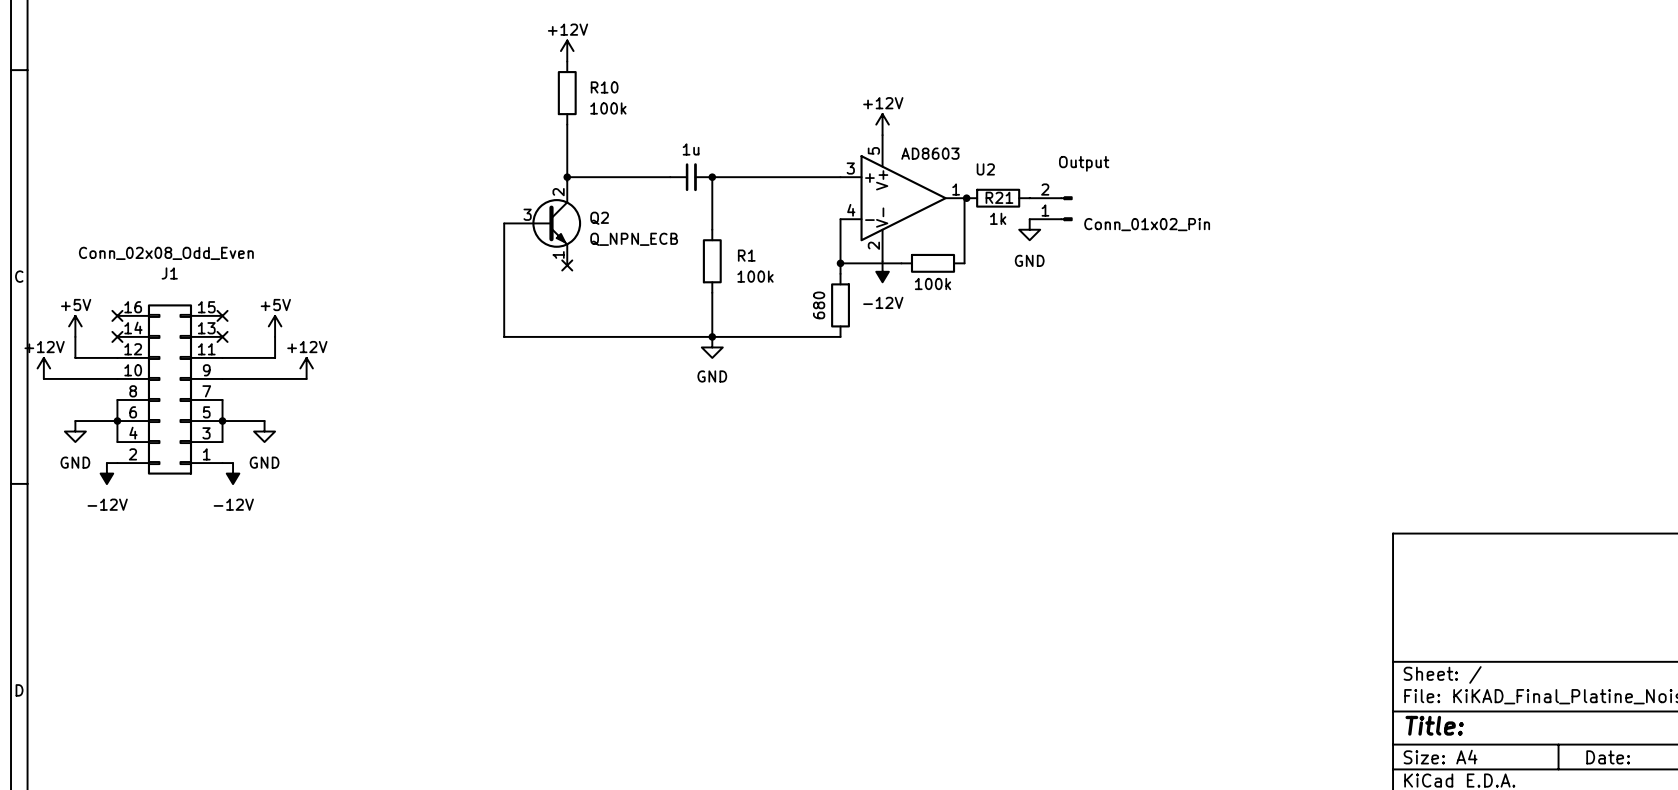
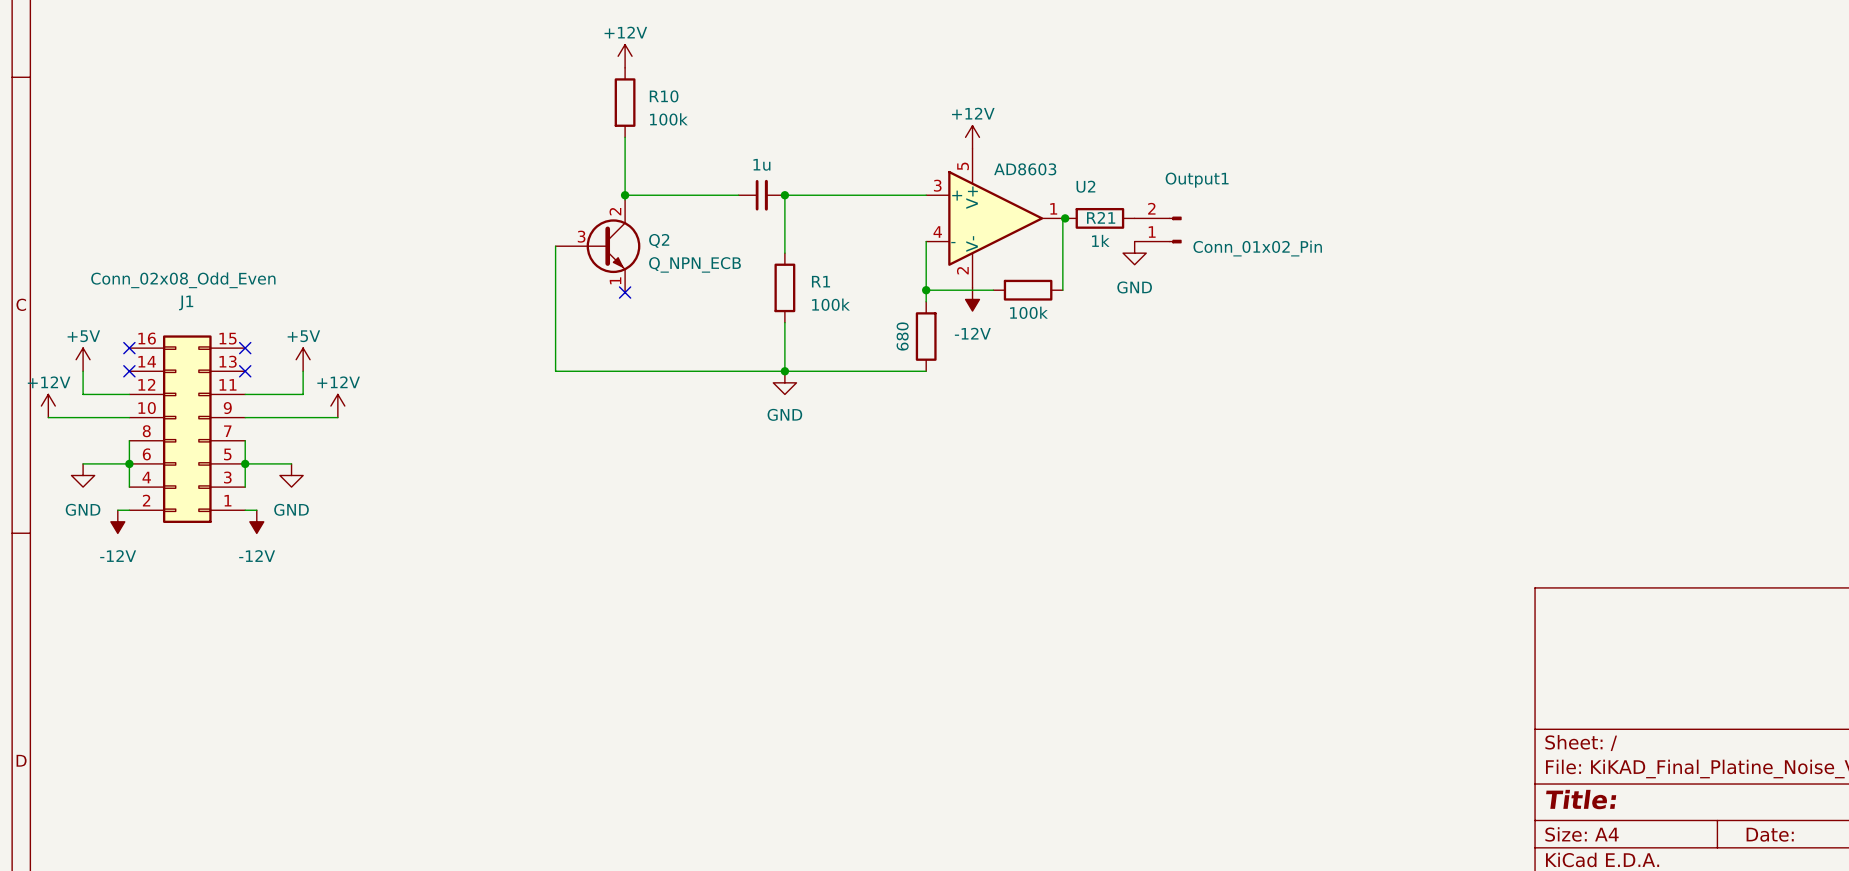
Output name: Output (1084, 163) -> Output1 (1197, 180)

